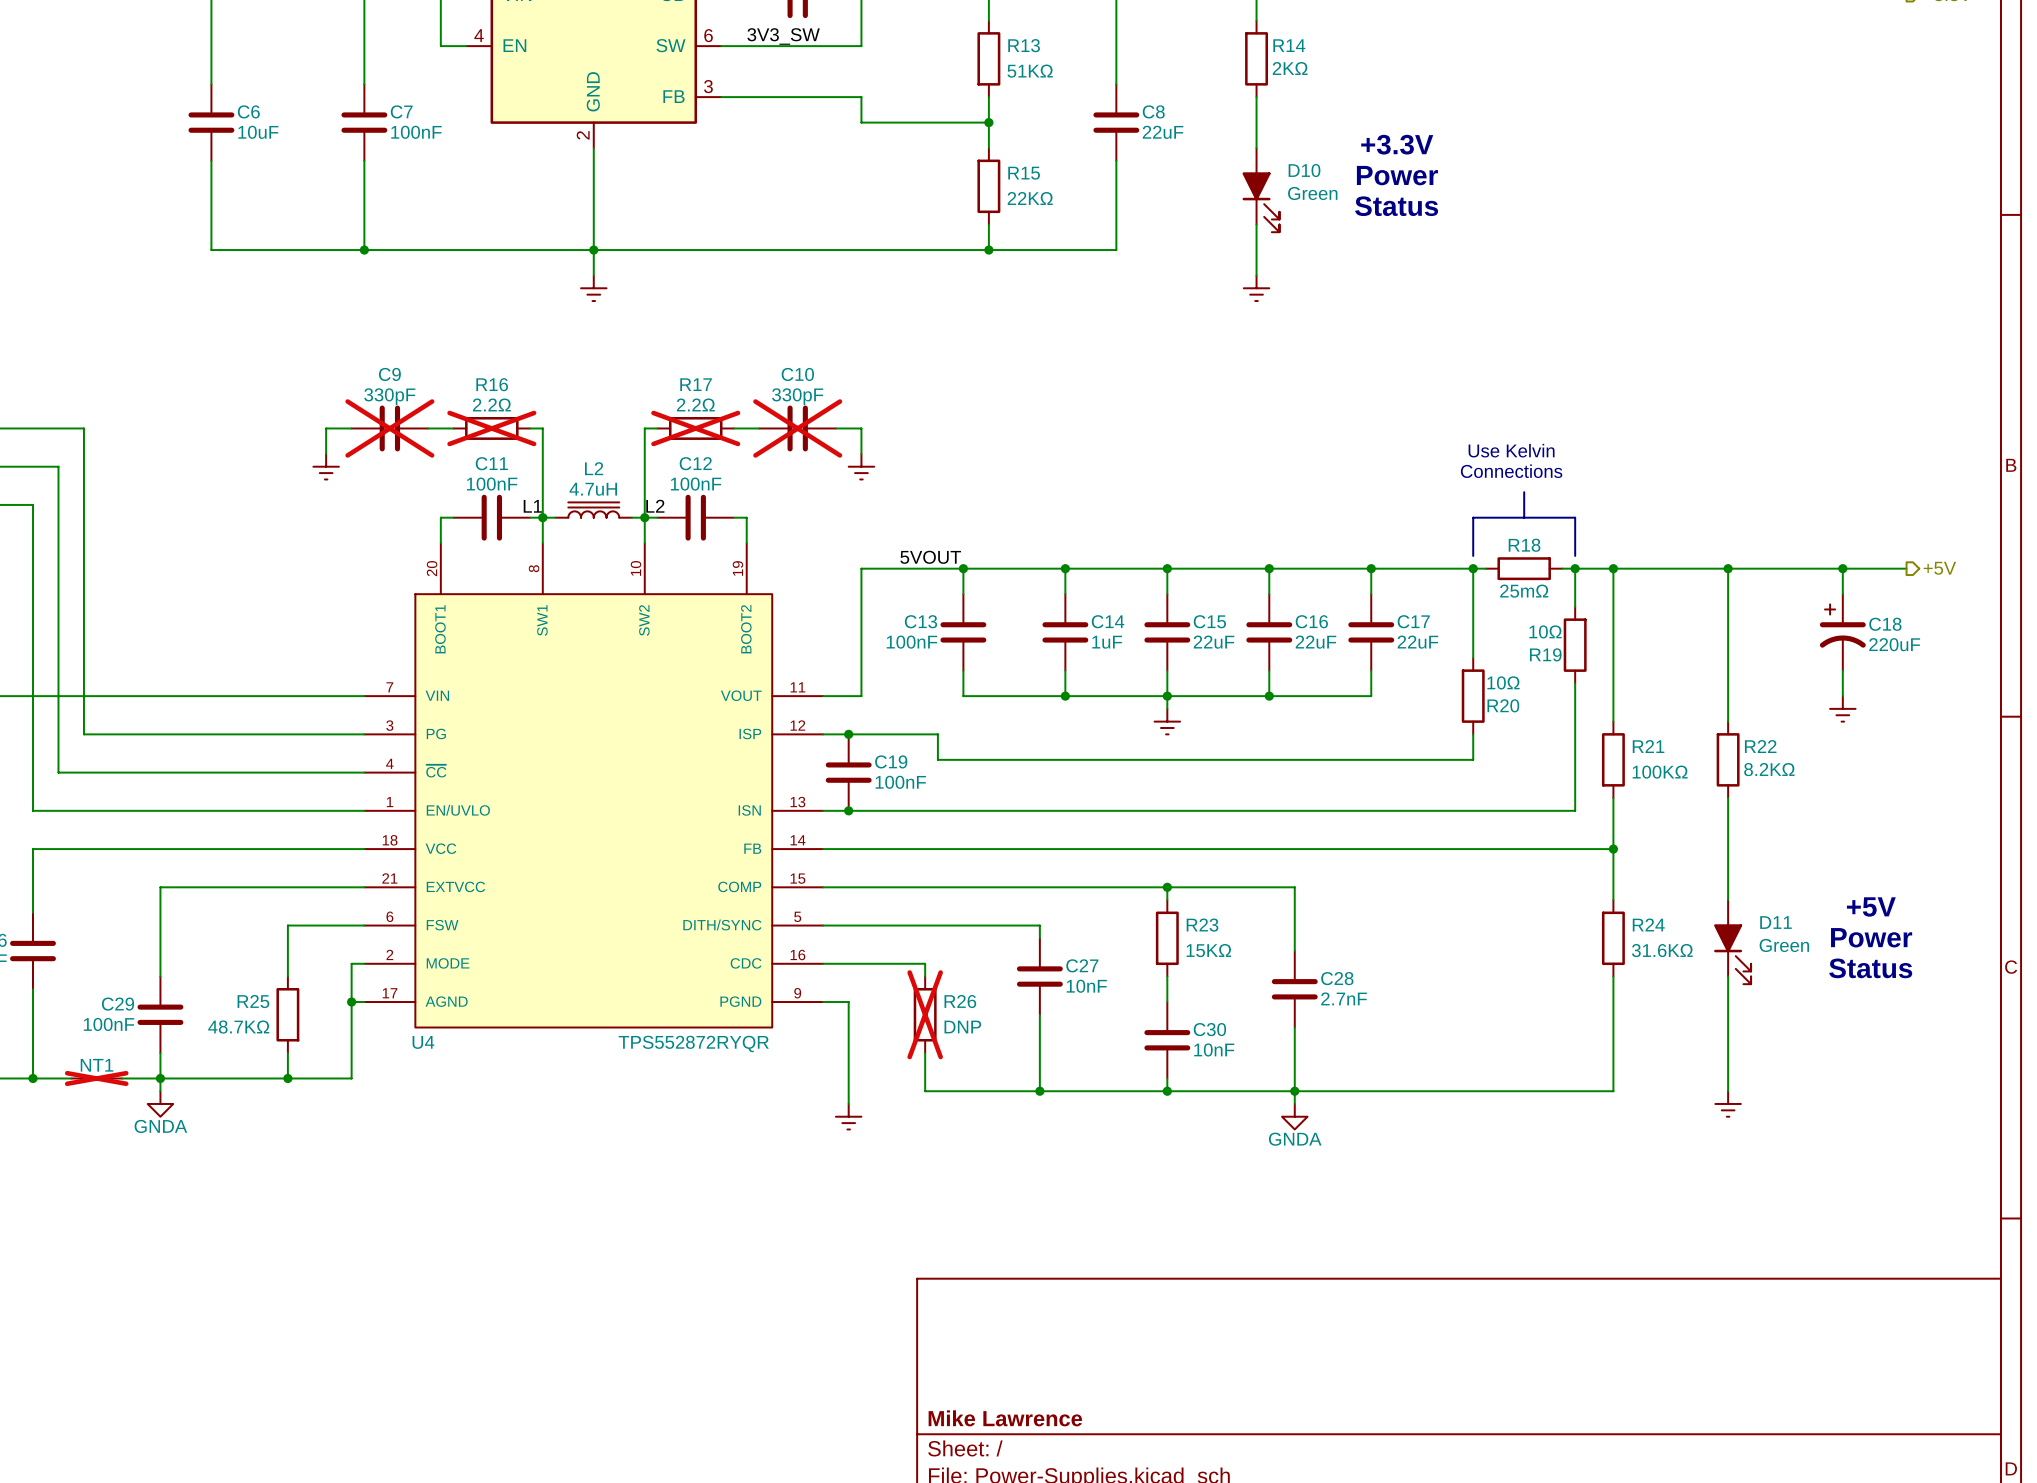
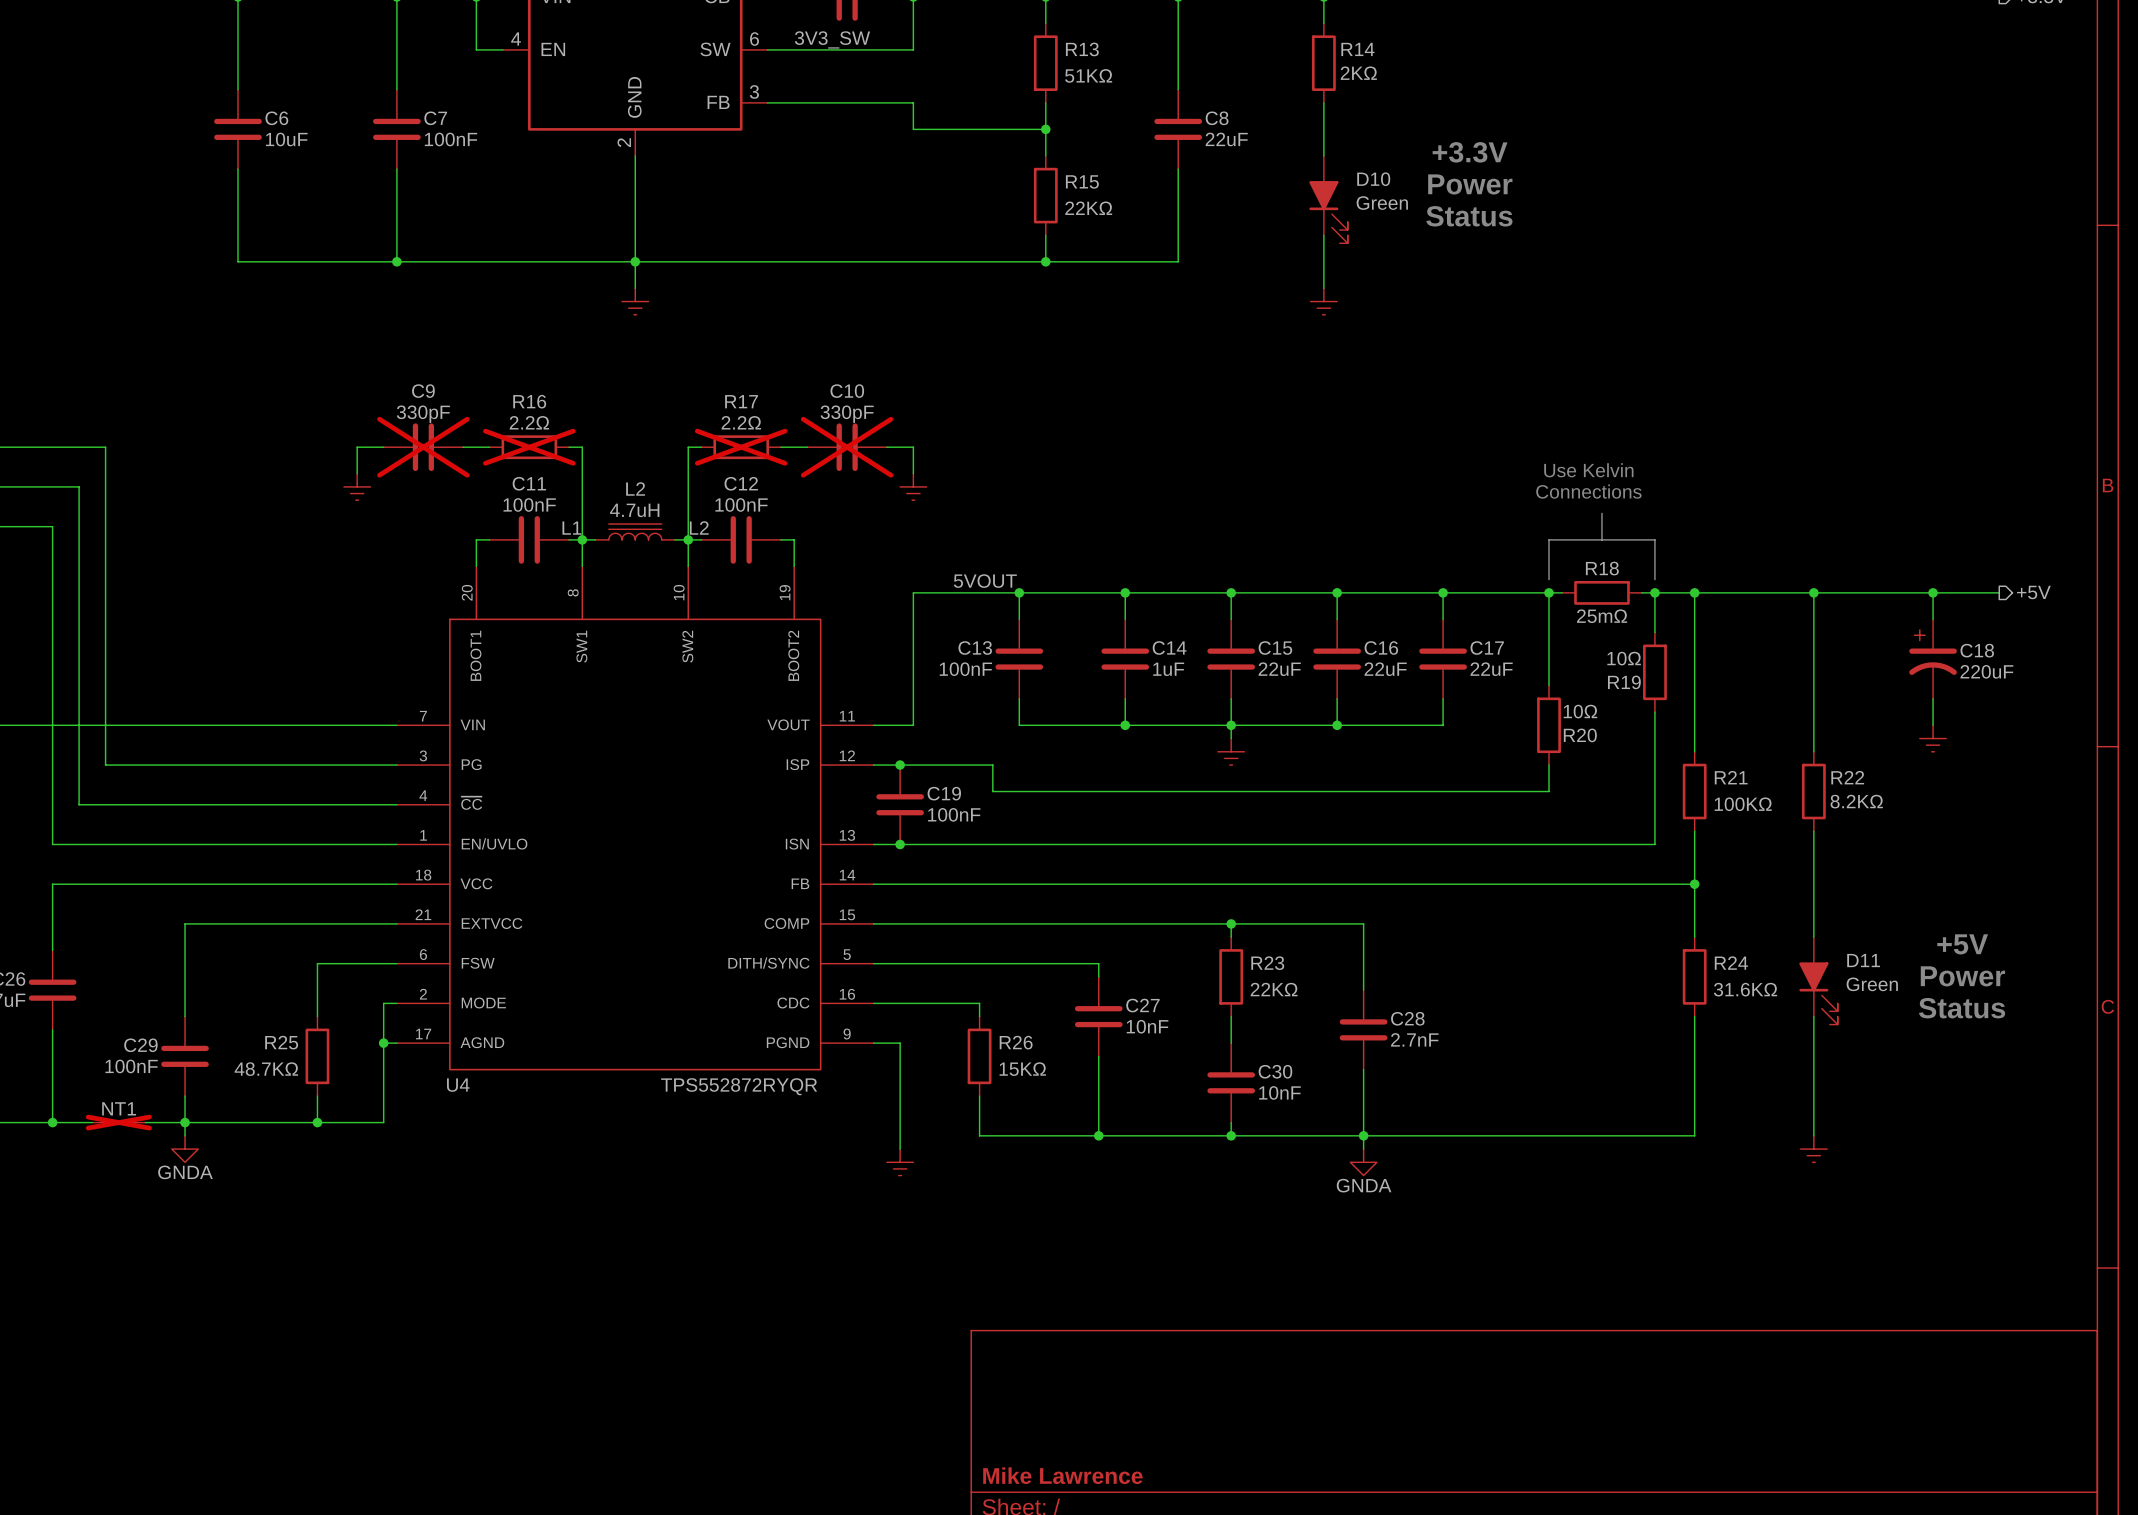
R23 value: 15KΩ (1208, 950) -> 22KΩ (1274, 989)
R26 do-not-place cross: (925, 1014) -> none
R26 value: DNP (962, 1027) -> 15KΩ (1022, 1069)

